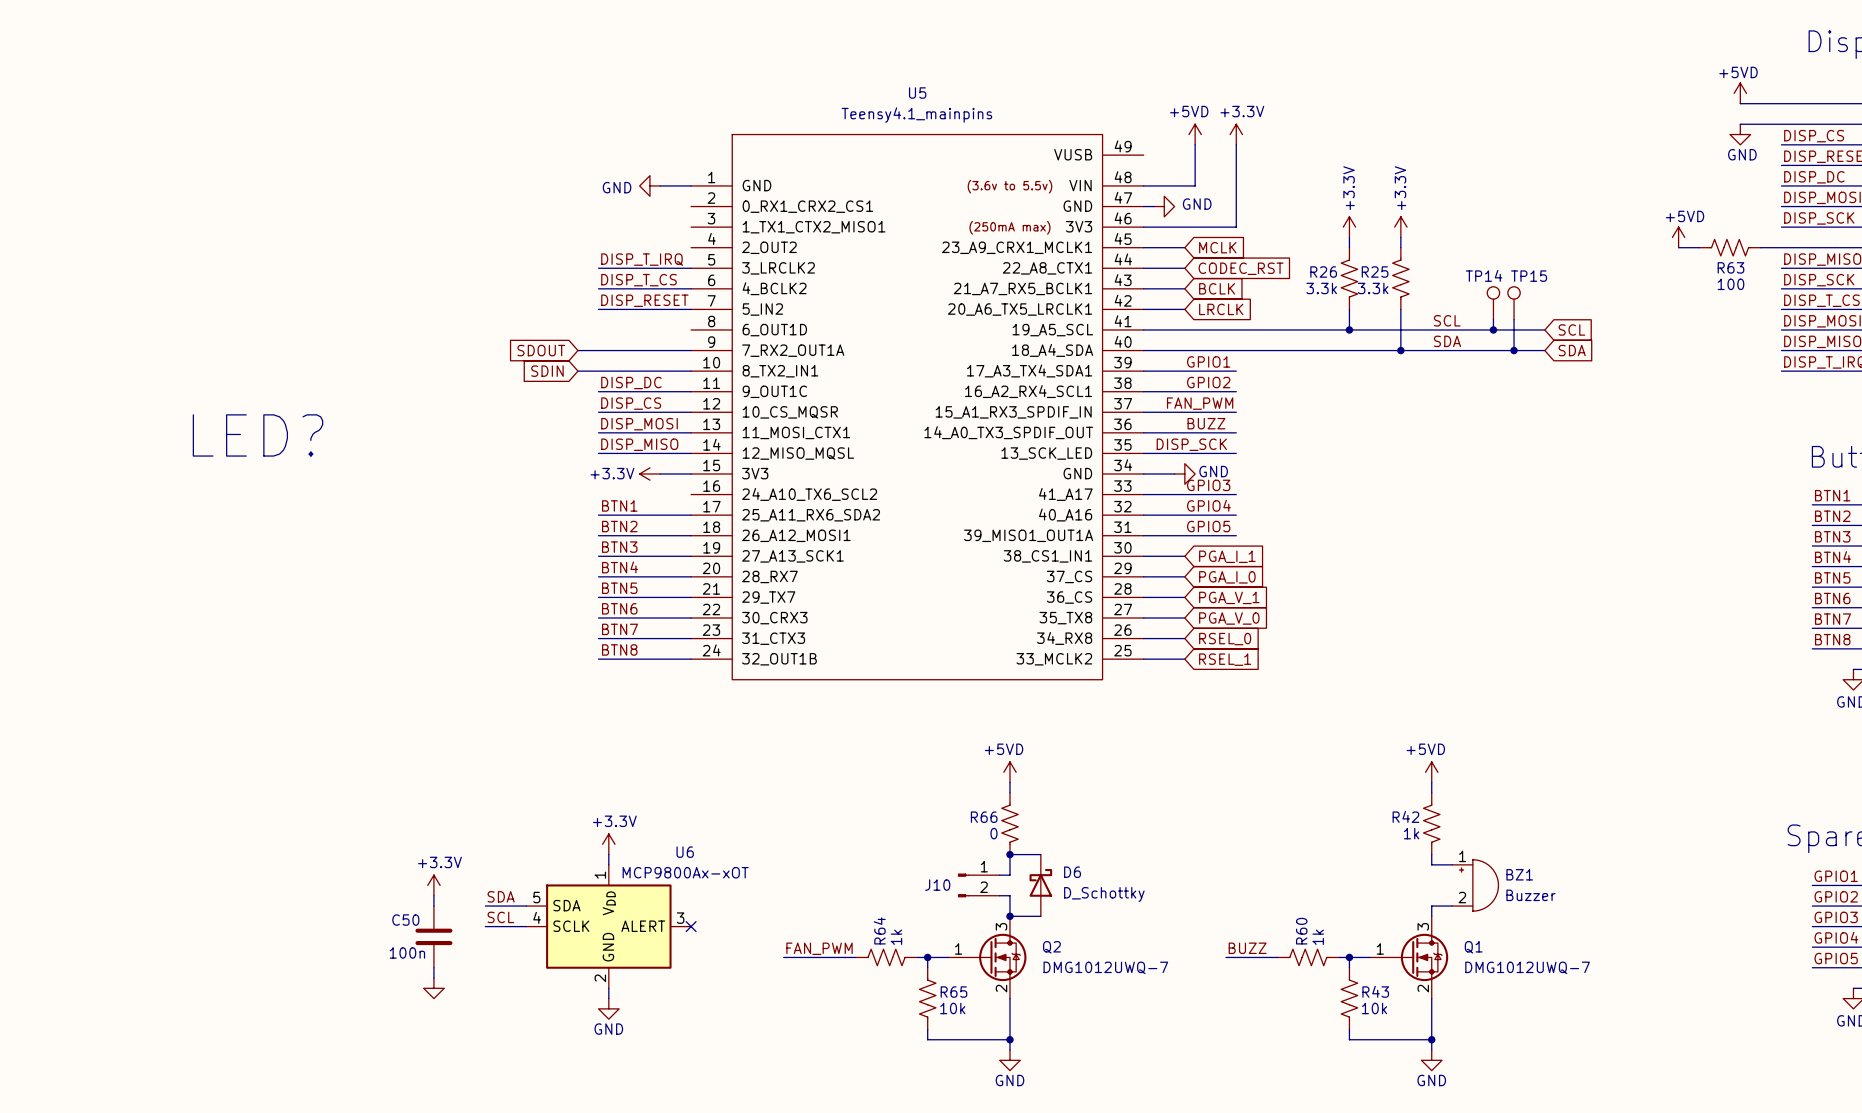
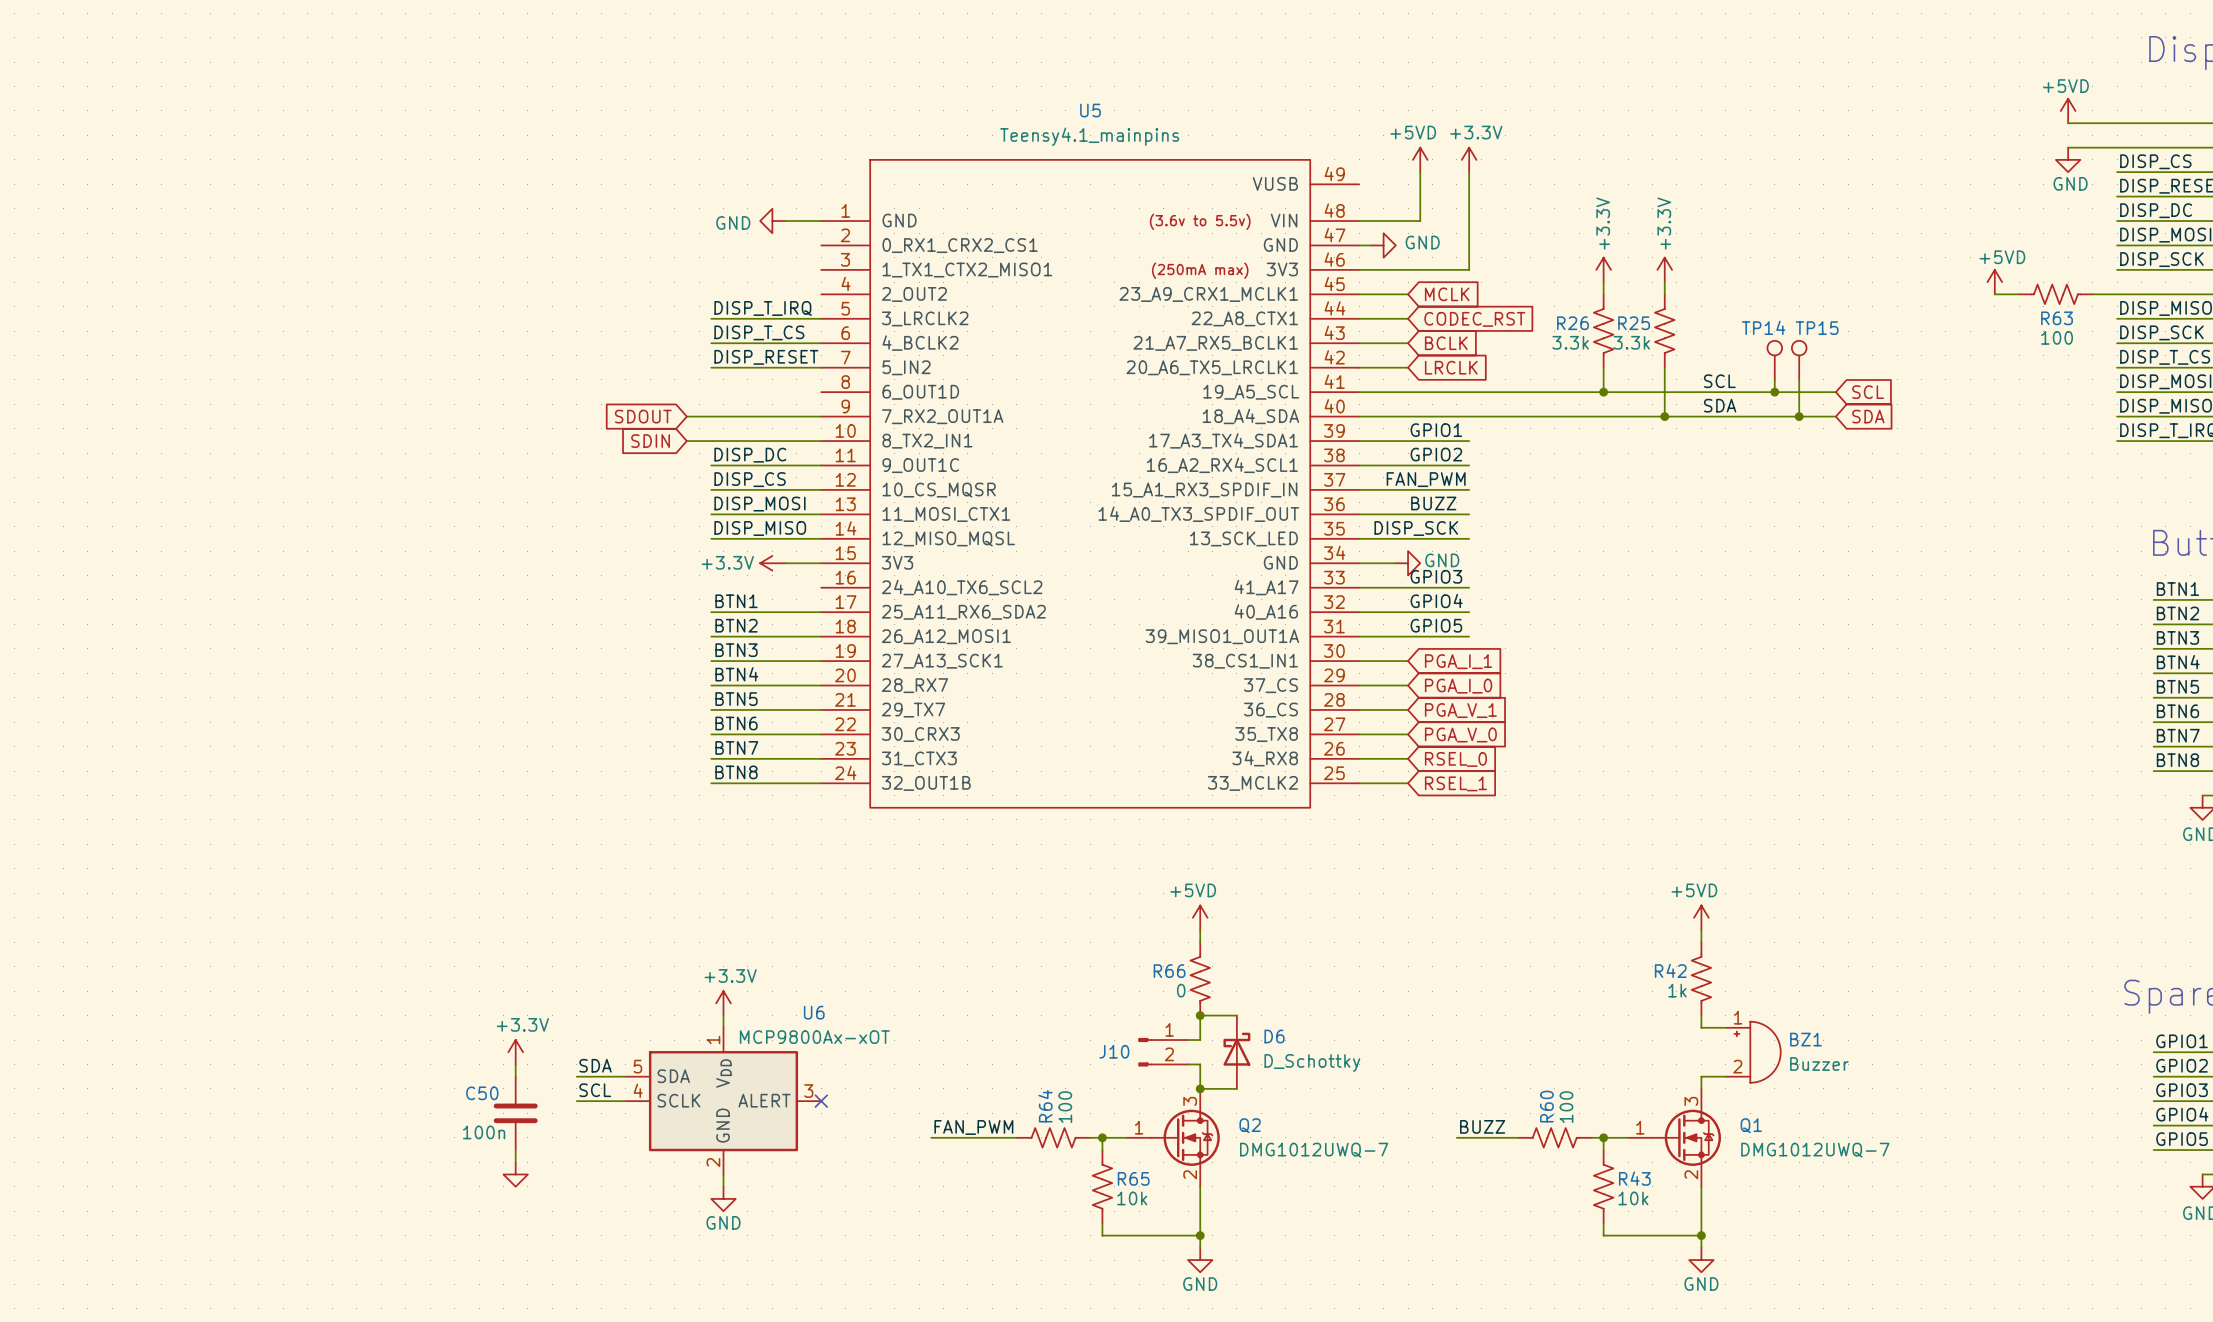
text: LED? (258, 435) -> none
R64 value: 1k (896, 937) -> 100 (1065, 1107)
R60 value: 1k (1318, 937) -> 100 (1566, 1107)

